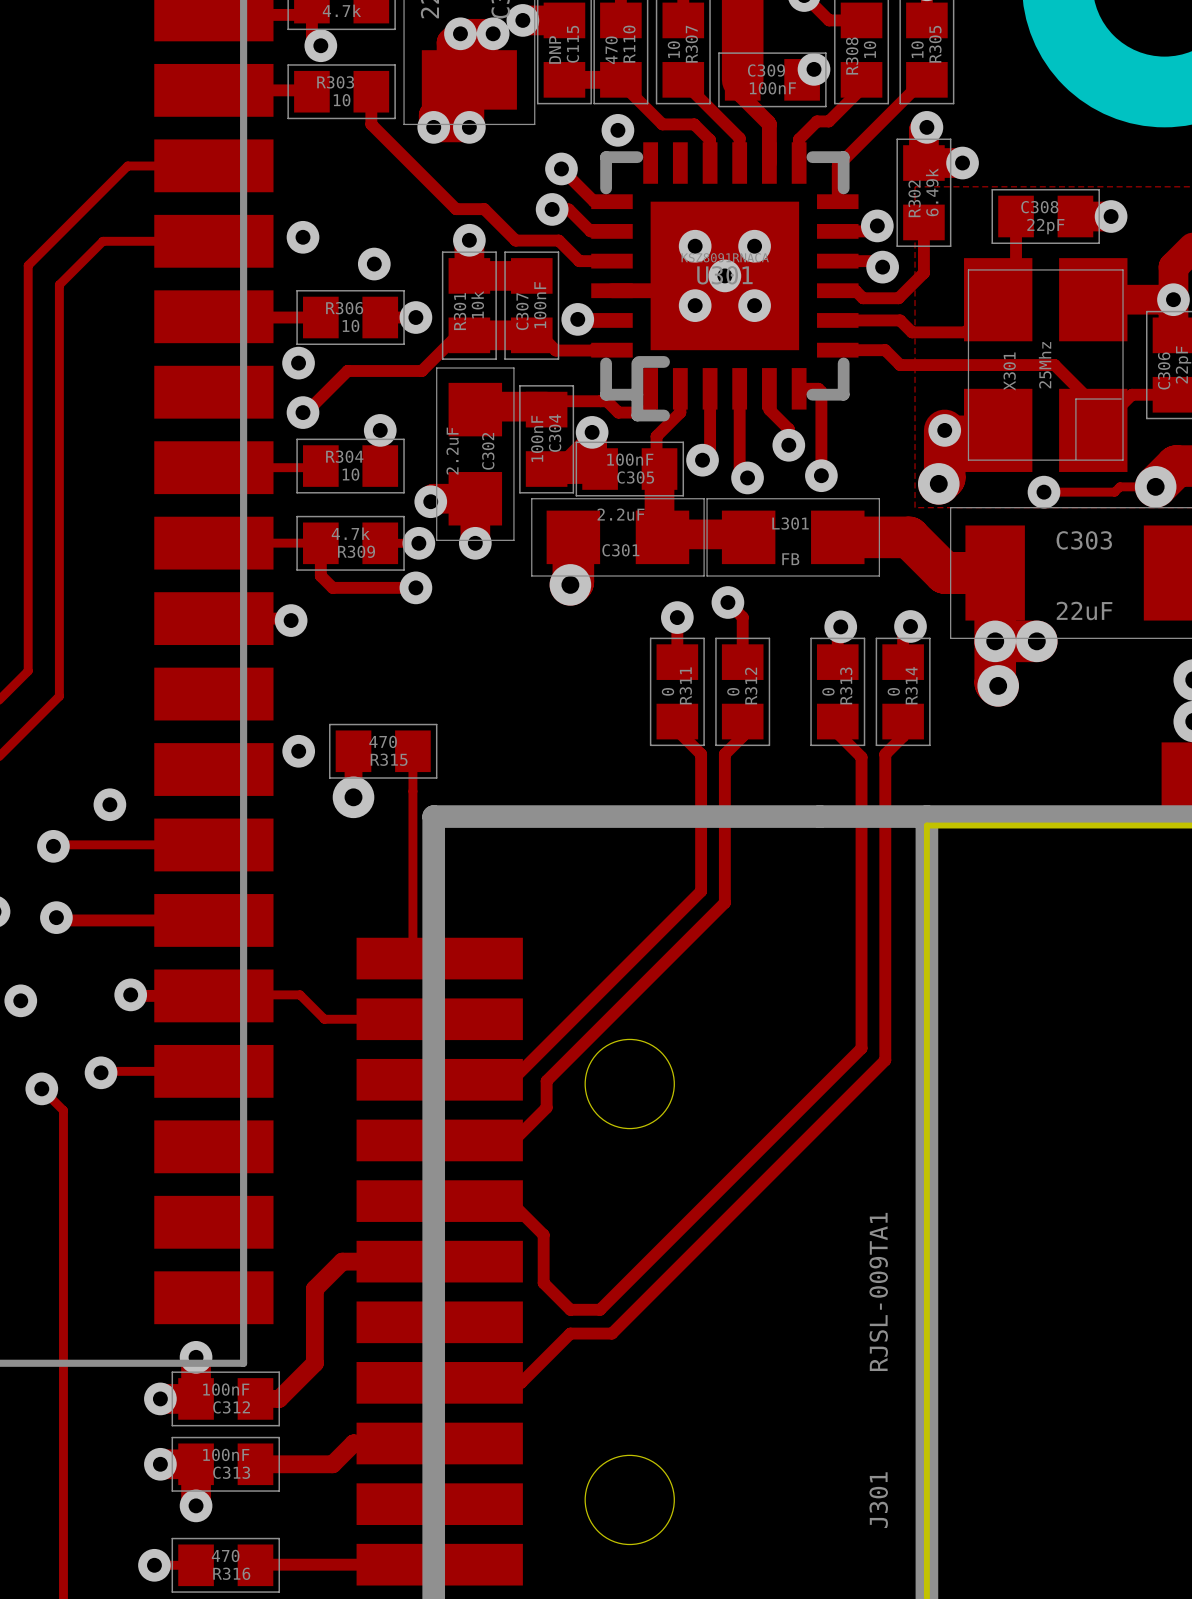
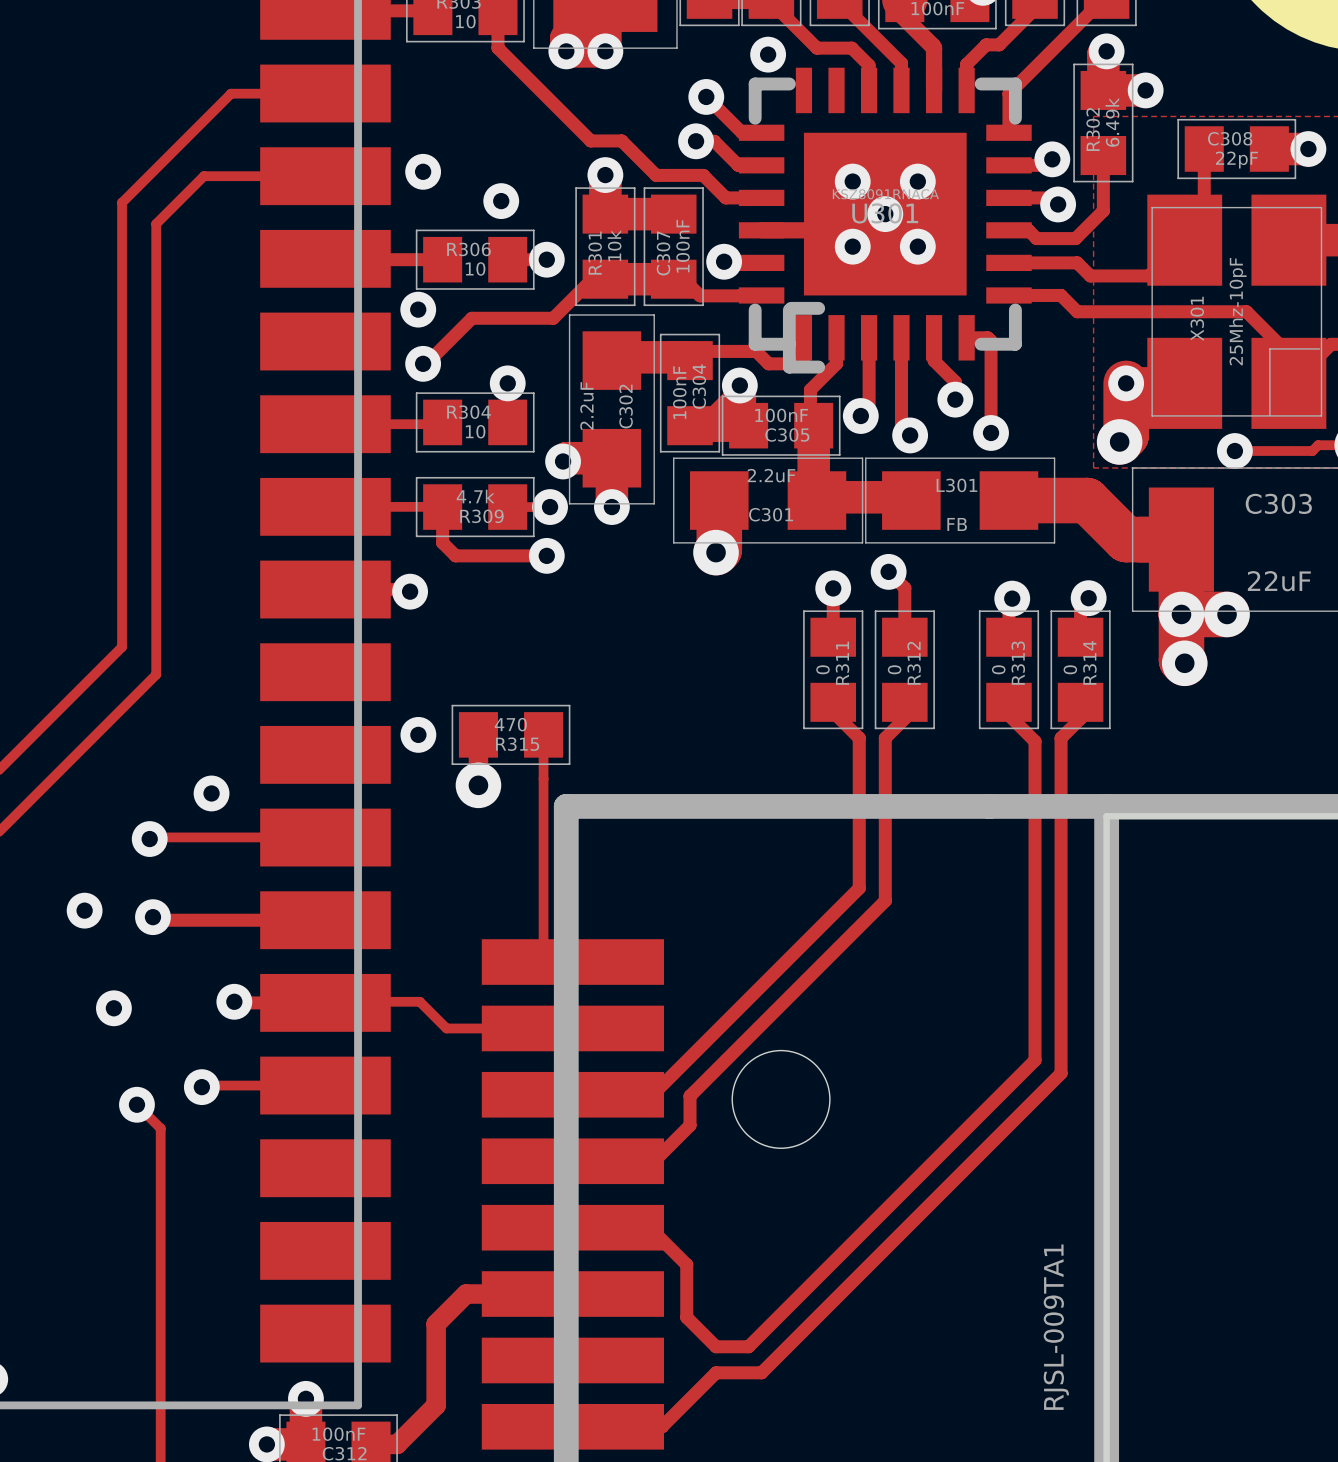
X301 value: 25Mhz (1045, 365) -> 25Mhz-10pF (1237, 311)

